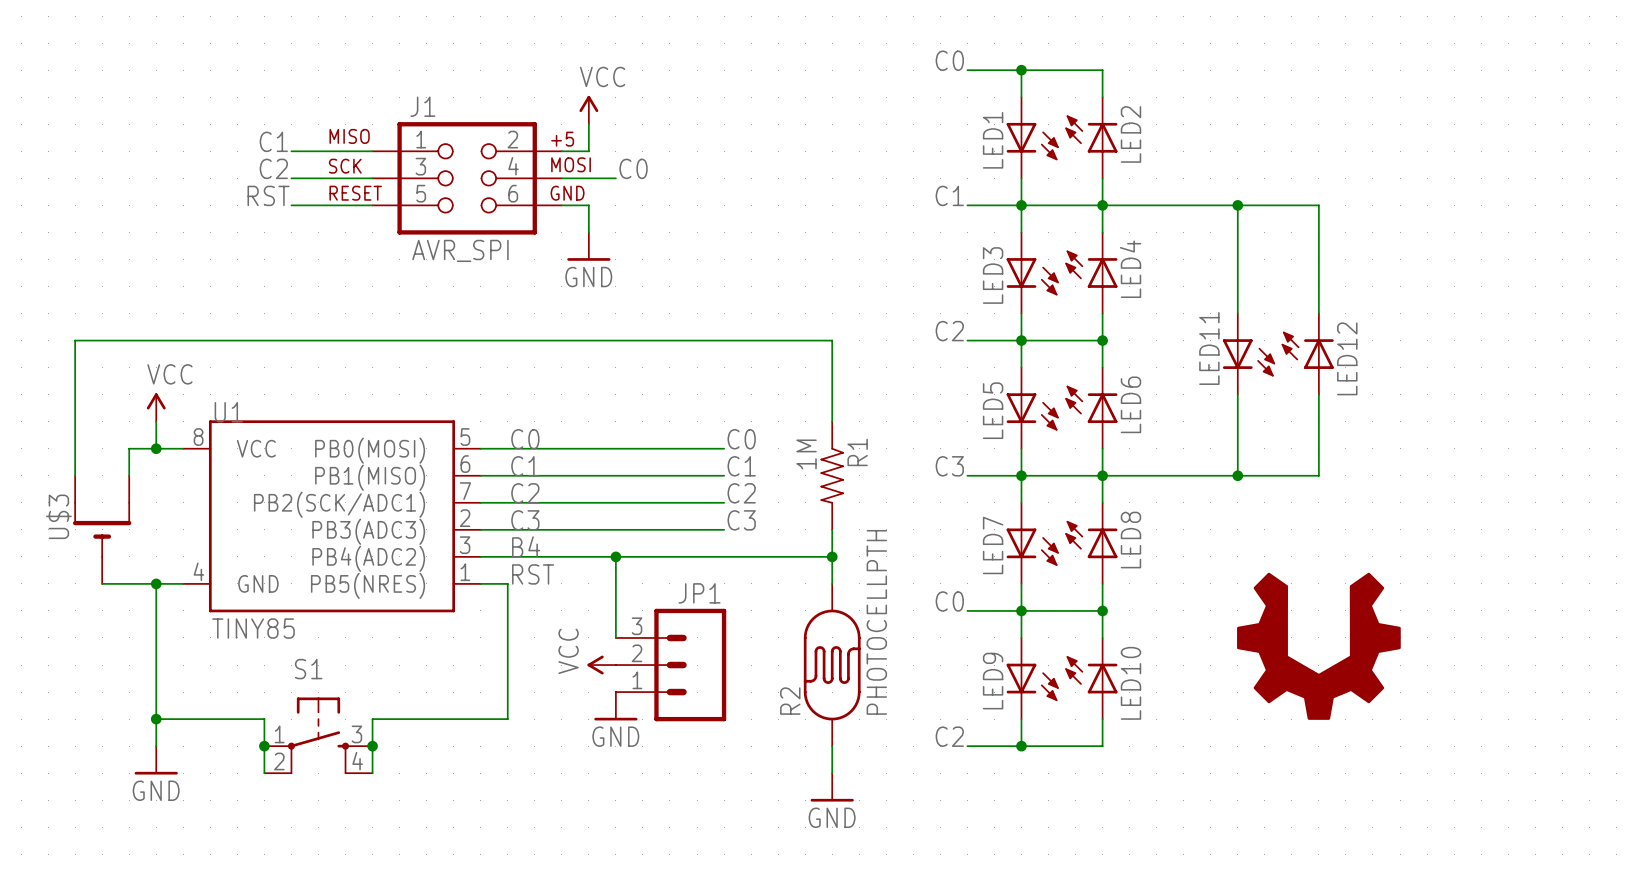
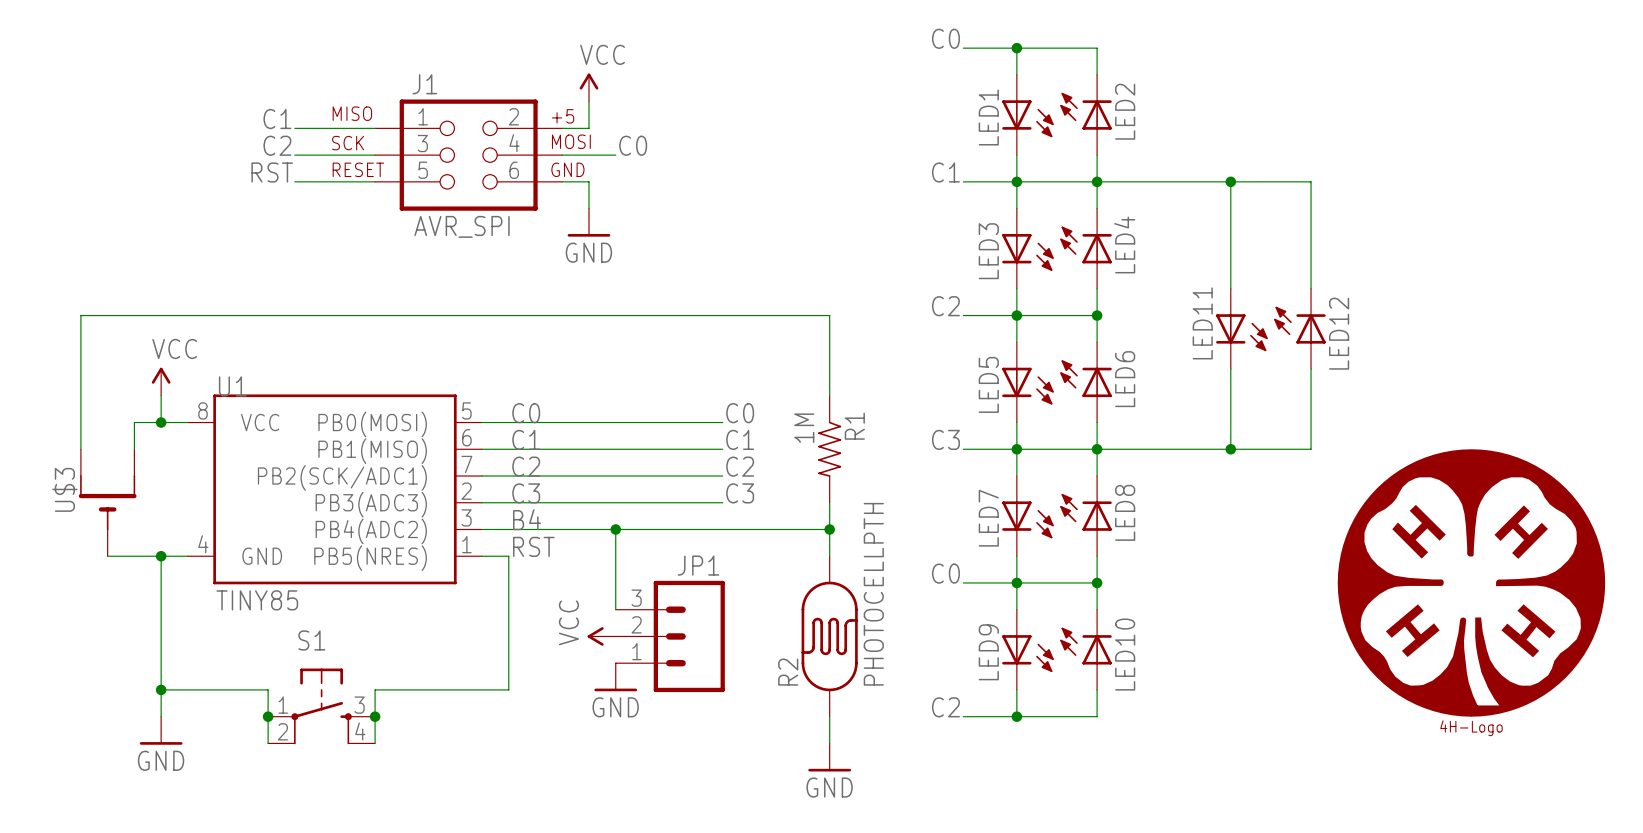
part: none -> (1471, 582)
part: (1318, 646) -> none

